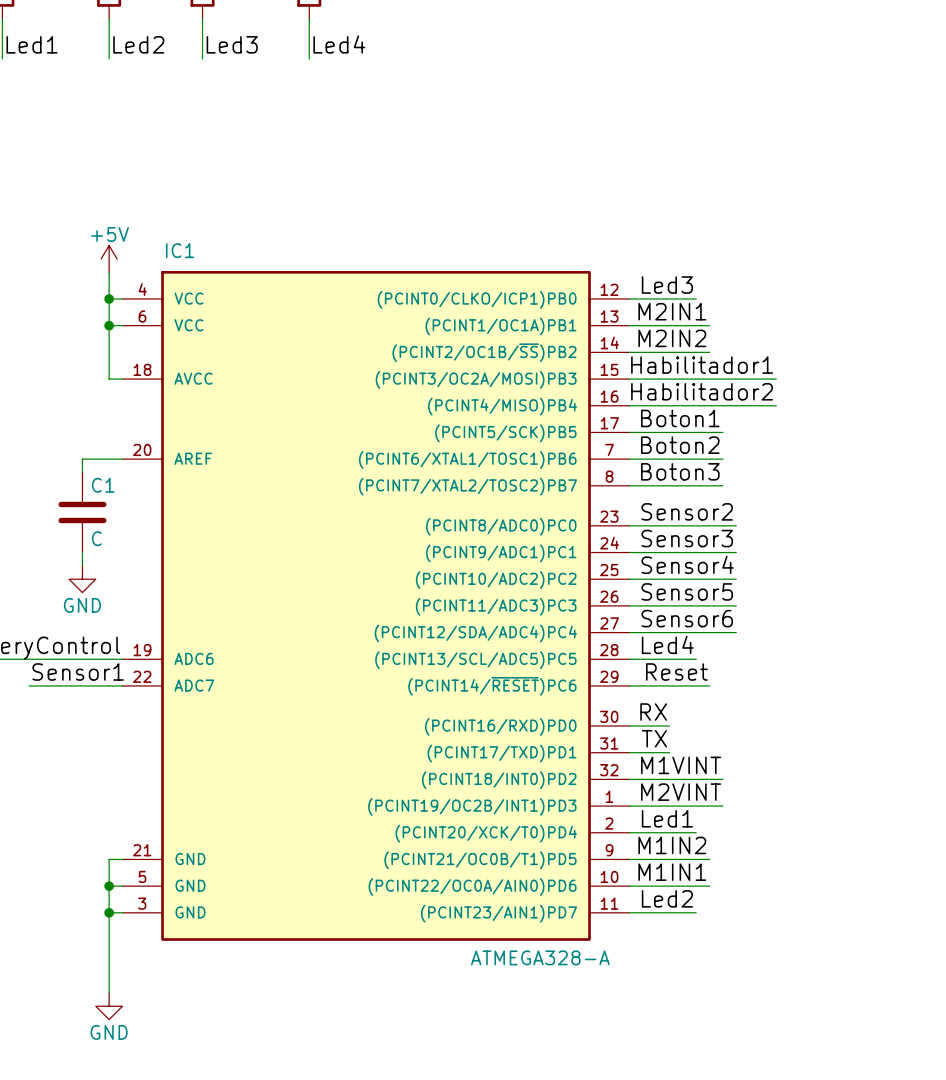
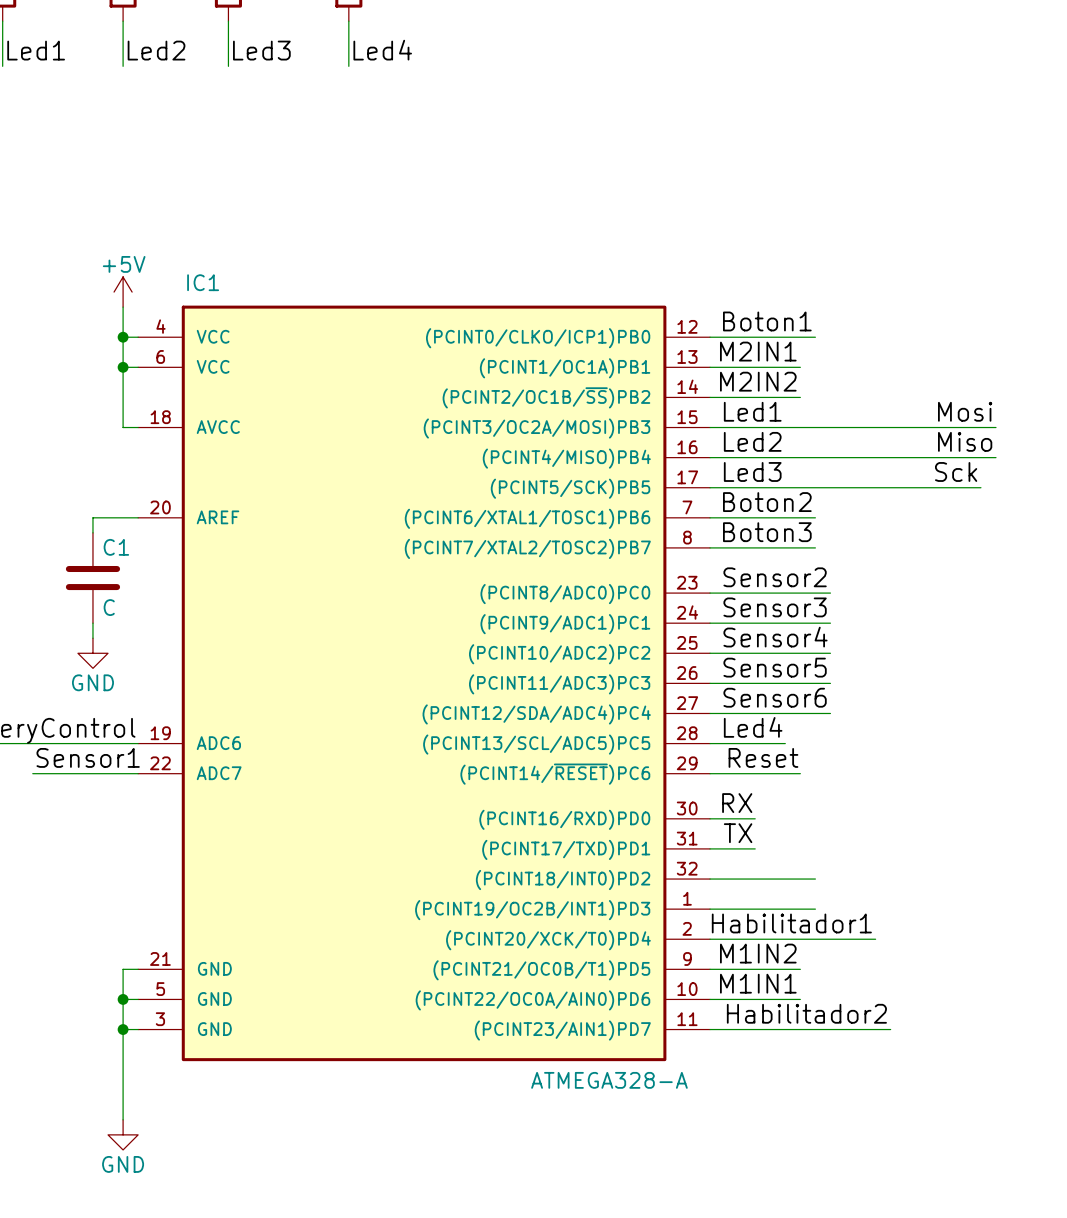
label position: Led3 (667, 285) -> Led3 (752, 471)
wire: none -> (785, 337) (815, 337)
label: none -> Led1 (752, 411)
label: Habilitador1 (702, 365) -> none
label: none -> Mosi (965, 411)
wire: none -> (875, 427) (995, 427)
label: none -> Led2 (752, 441)
label: Habilitador2 (702, 391) -> none
label: none -> Miso (965, 441)
wire: none -> (875, 457) (995, 457)
label position: Boton1 (680, 418) -> Boton1 (767, 321)
label: none -> Sck (956, 471)
wire: none -> (815, 487) (980, 487)
label: M1VINT (681, 765) -> none
label: M2VINT (681, 792) -> none
label: Led1 (667, 818) -> none
label: none -> Habilitador1 (791, 923)
wire: none -> (785, 939) (875, 939)
label: Led2 (667, 898) -> none
label: none -> Habilitador2 (806, 1013)
wire: none -> (785, 1029) (890, 1029)

